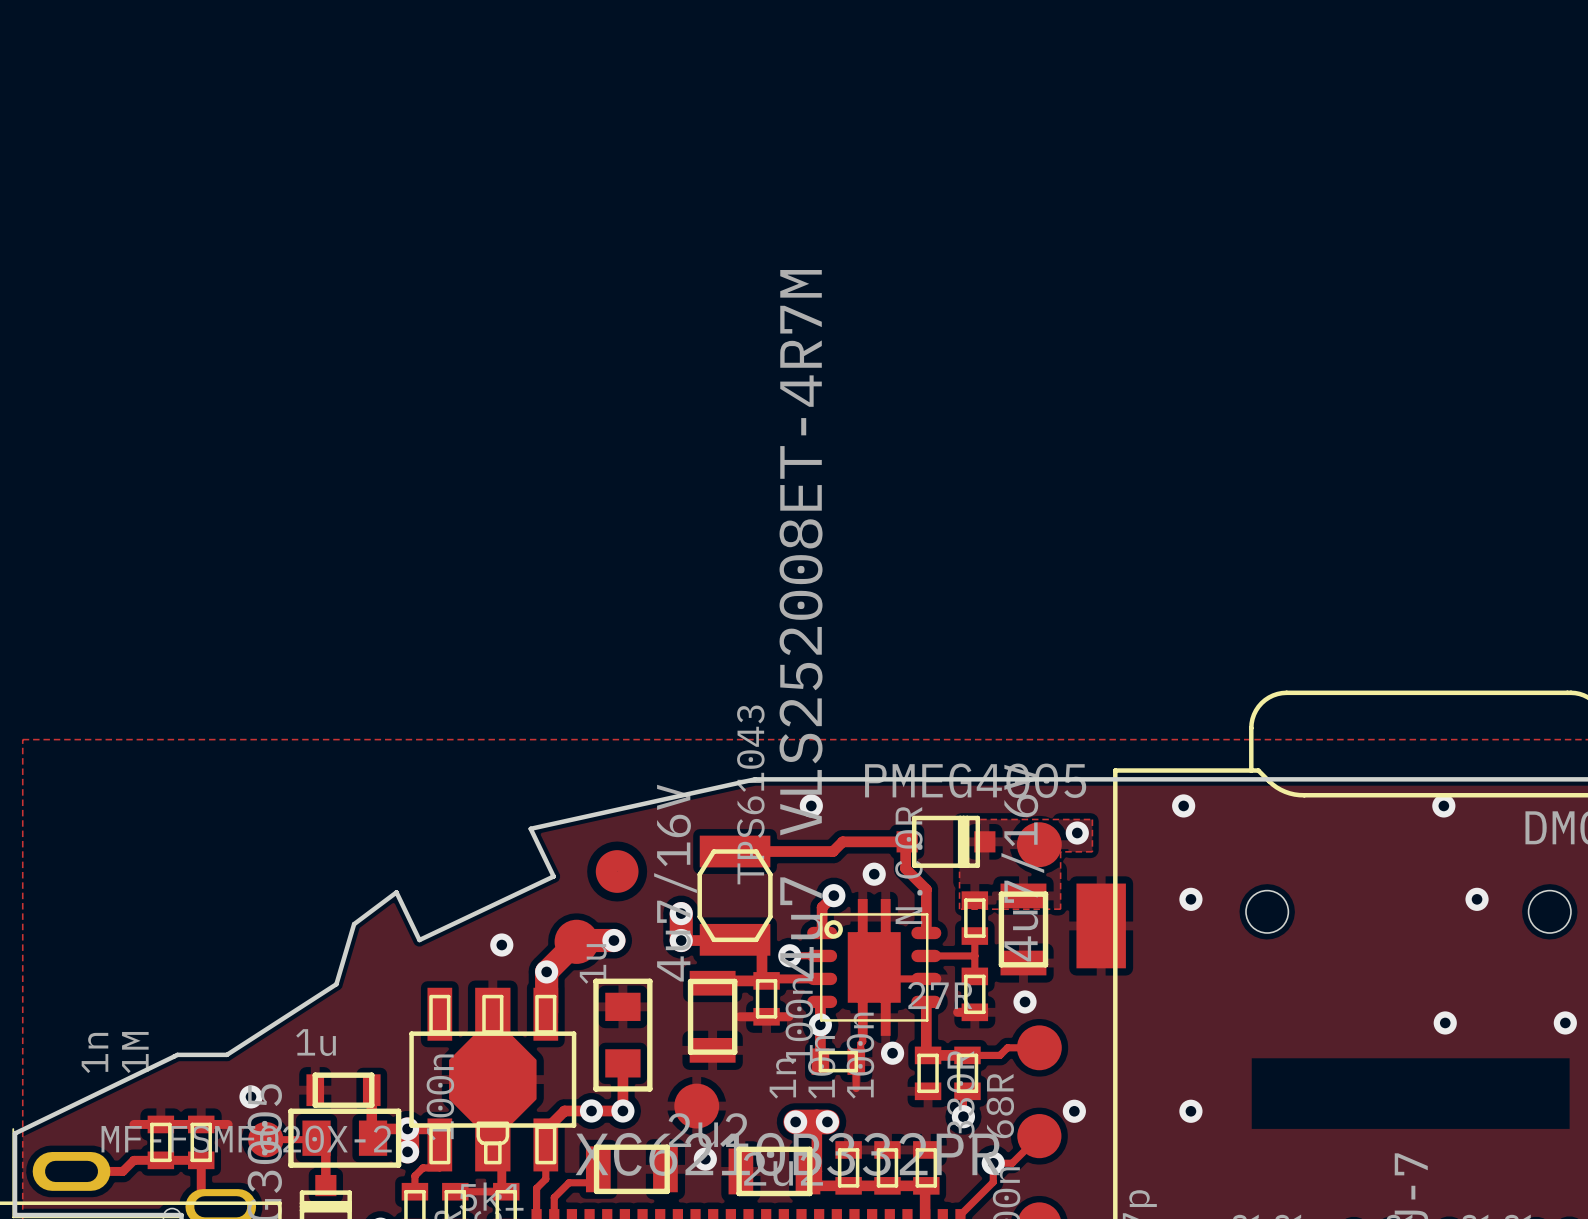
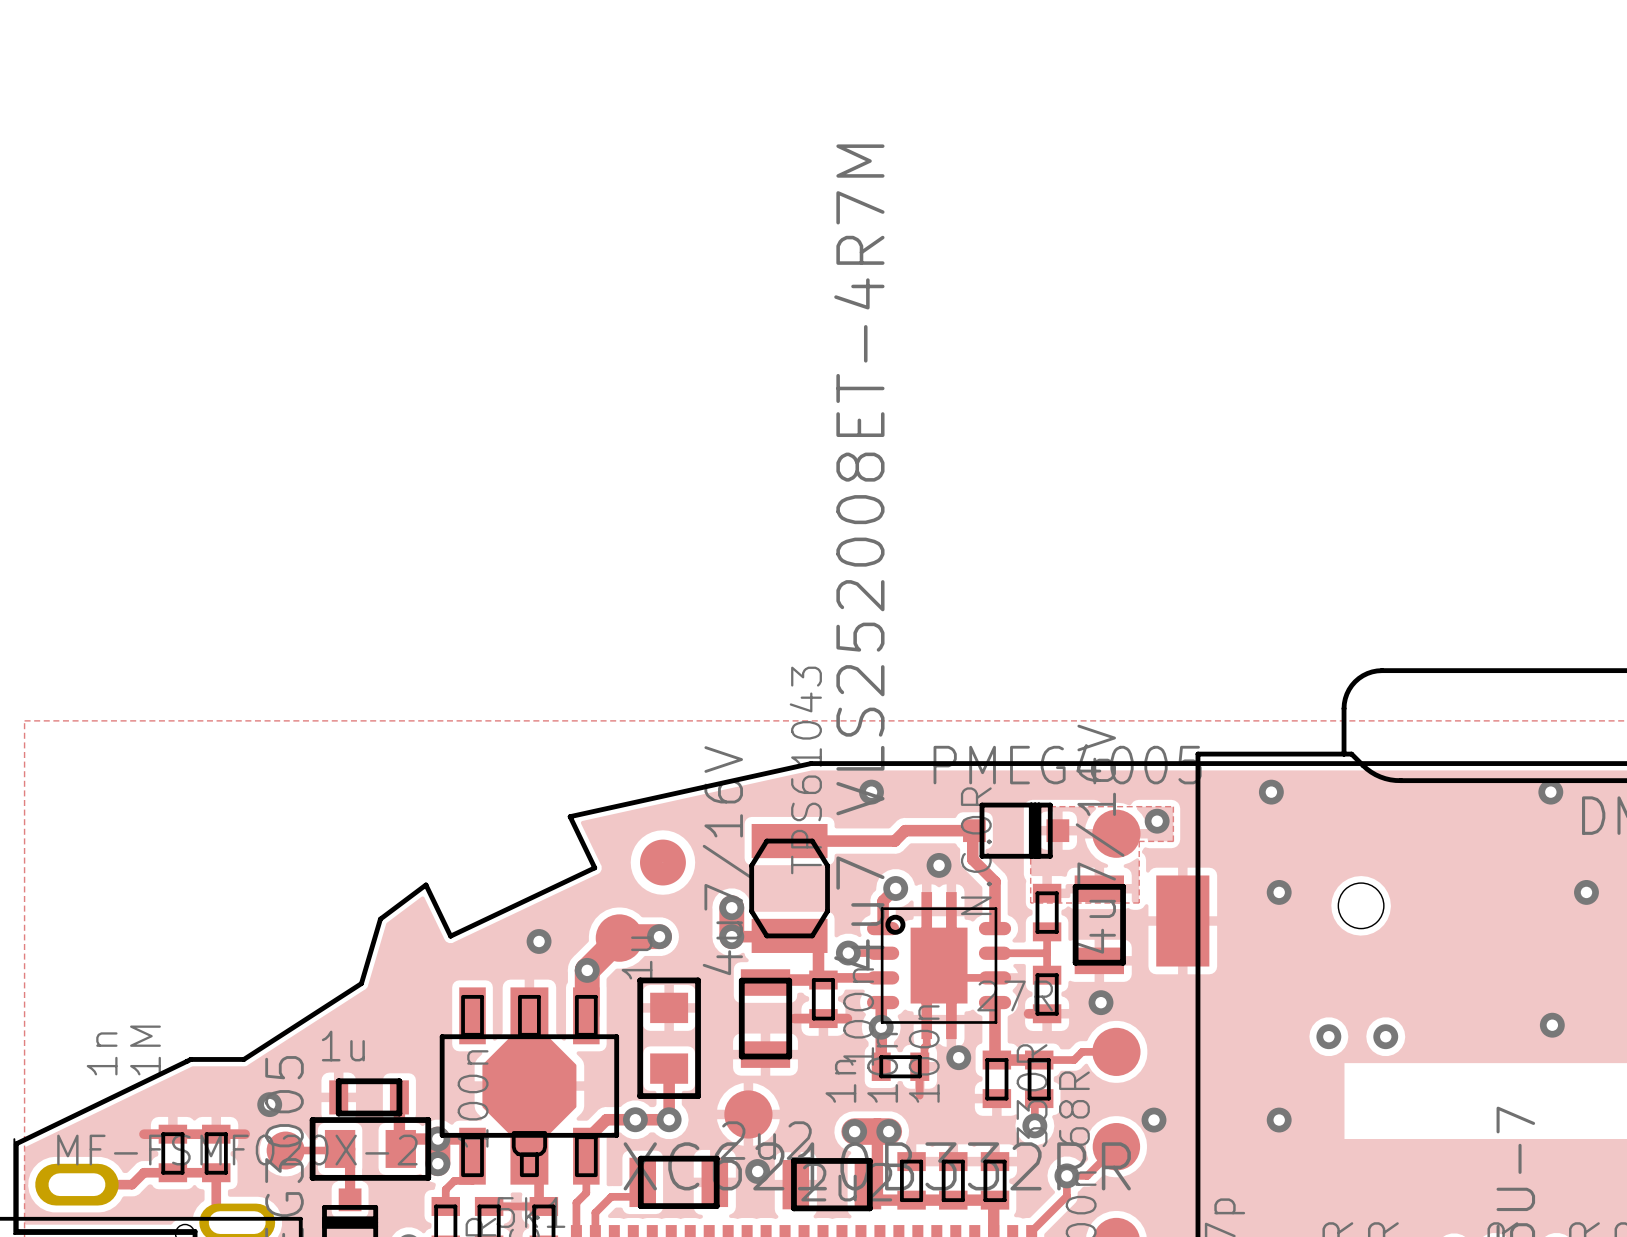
via: none -> (1328, 1036)
via: none -> (1385, 1036)

